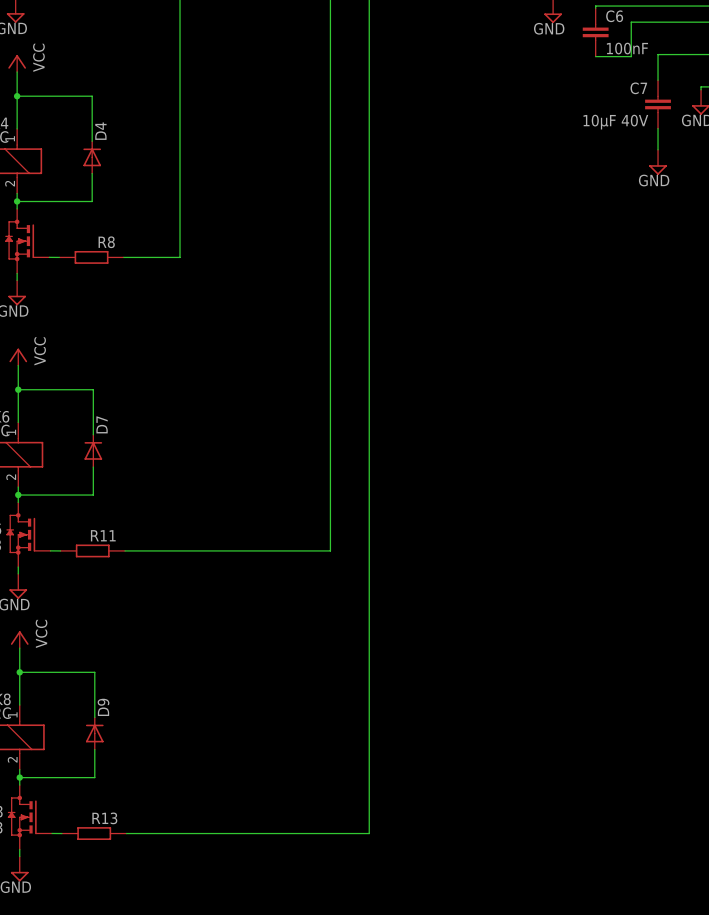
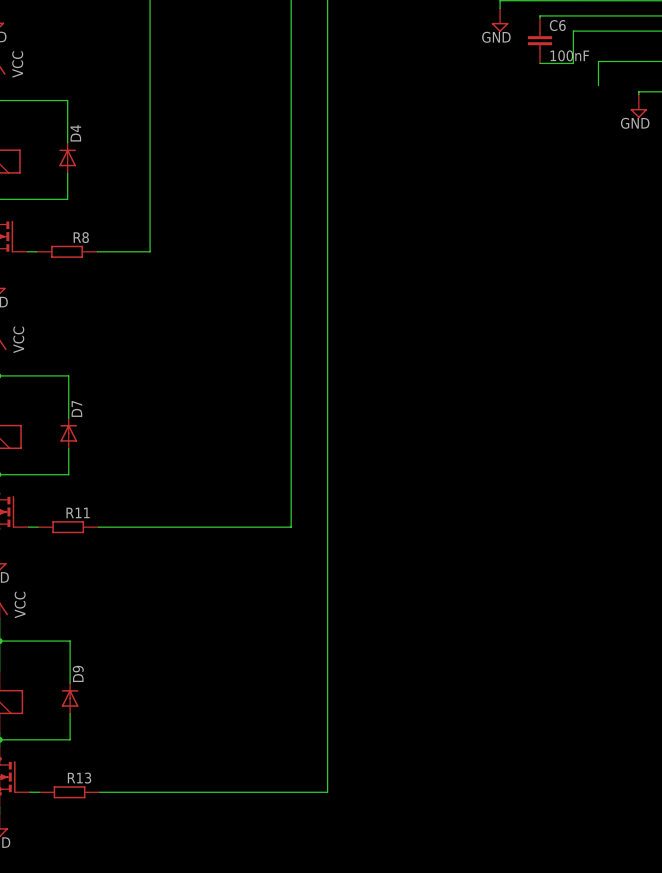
C7: 10µF 40V (658, 104) -> none
wire: (658, 128) (658, 149) -> none
power symbol: GND (658, 162) -> none

